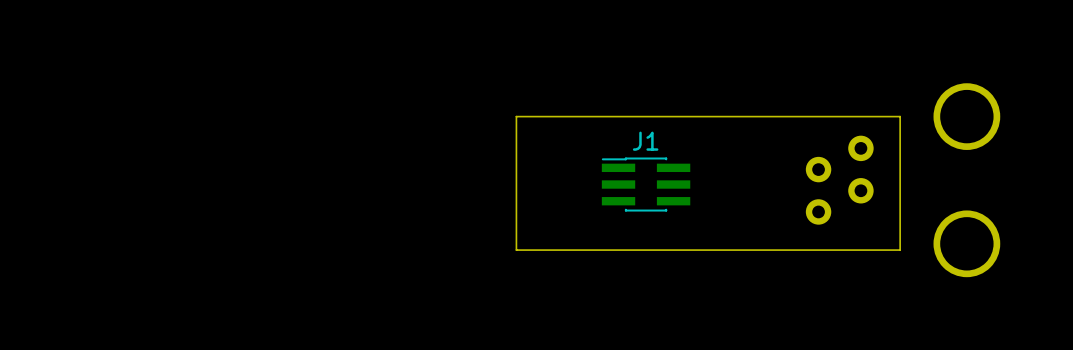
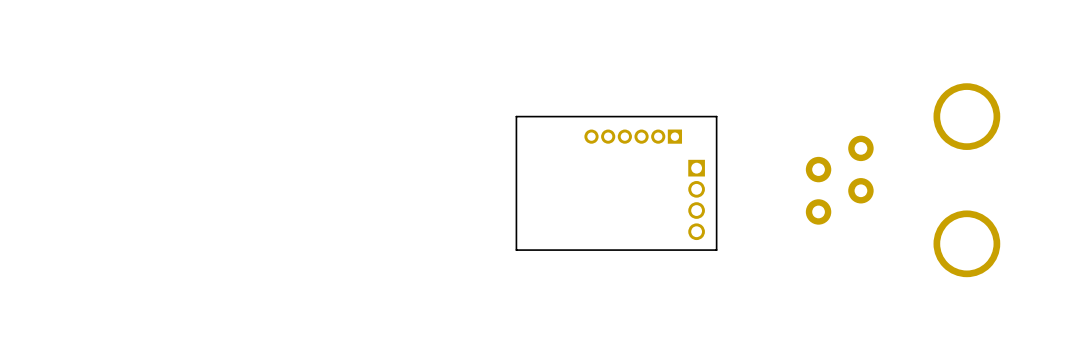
board edge: (716, 116) (900, 116) (900, 250) (716, 250) -> (716, 116) (716, 250)
part: none -> (633, 136)
J1: (646, 184) -> none
part: none -> (696, 199)

